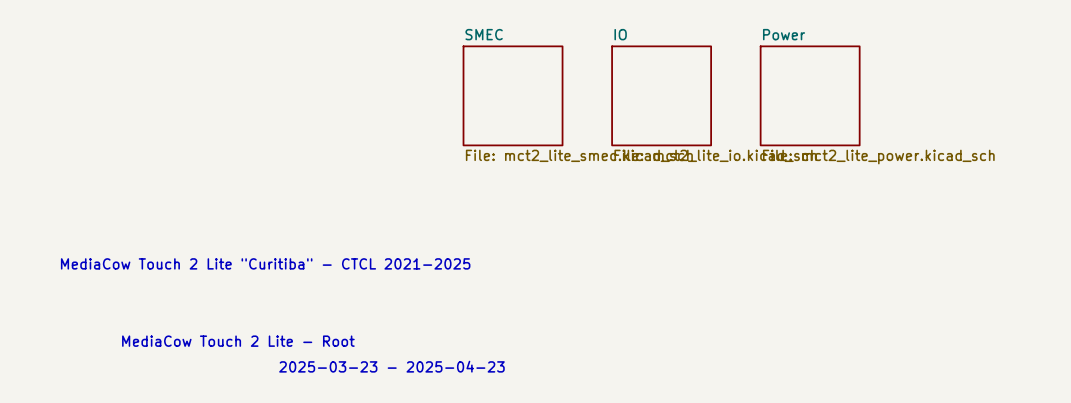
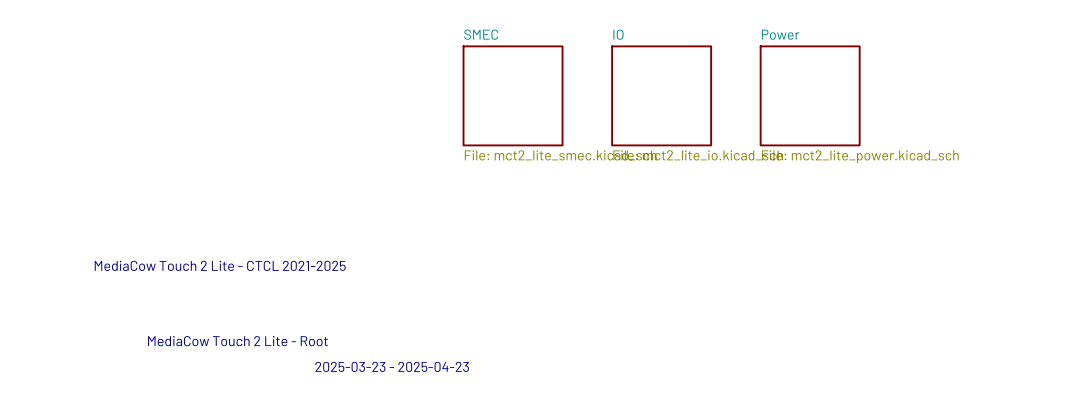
text: MediaCow Touch 2 Lite "Curitiba" - CTCL 2021-2025 (265, 263) -> MediaCow Touch 2 Lite - CTCL 2021-2025 (220, 265)

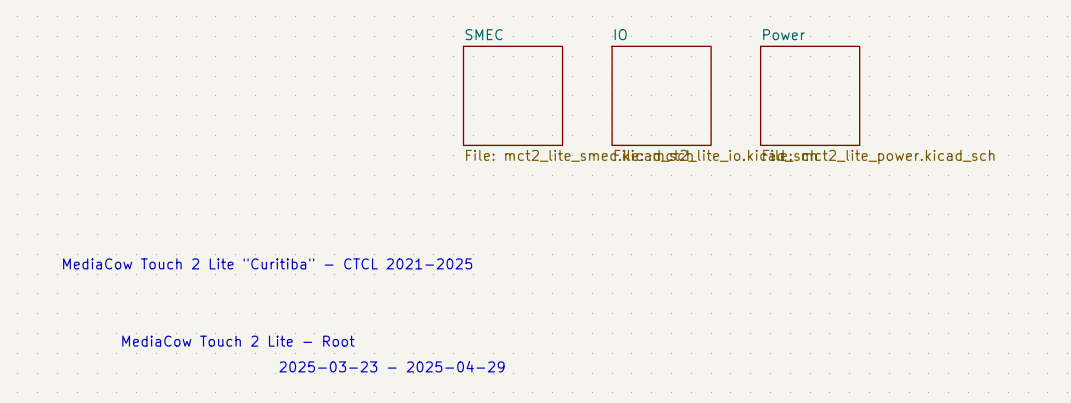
text: MediaCow Touch 2 Lite - CTCL 2021-2025 (220, 265) -> MediaCow Touch 2 Lite "Curitiba" - CTCL 2021-2025 (267, 263)
text: 2025-03-23 - 2025-04-23 (392, 366) -> 2025-03-23 - 2025-04-29 (391, 366)

